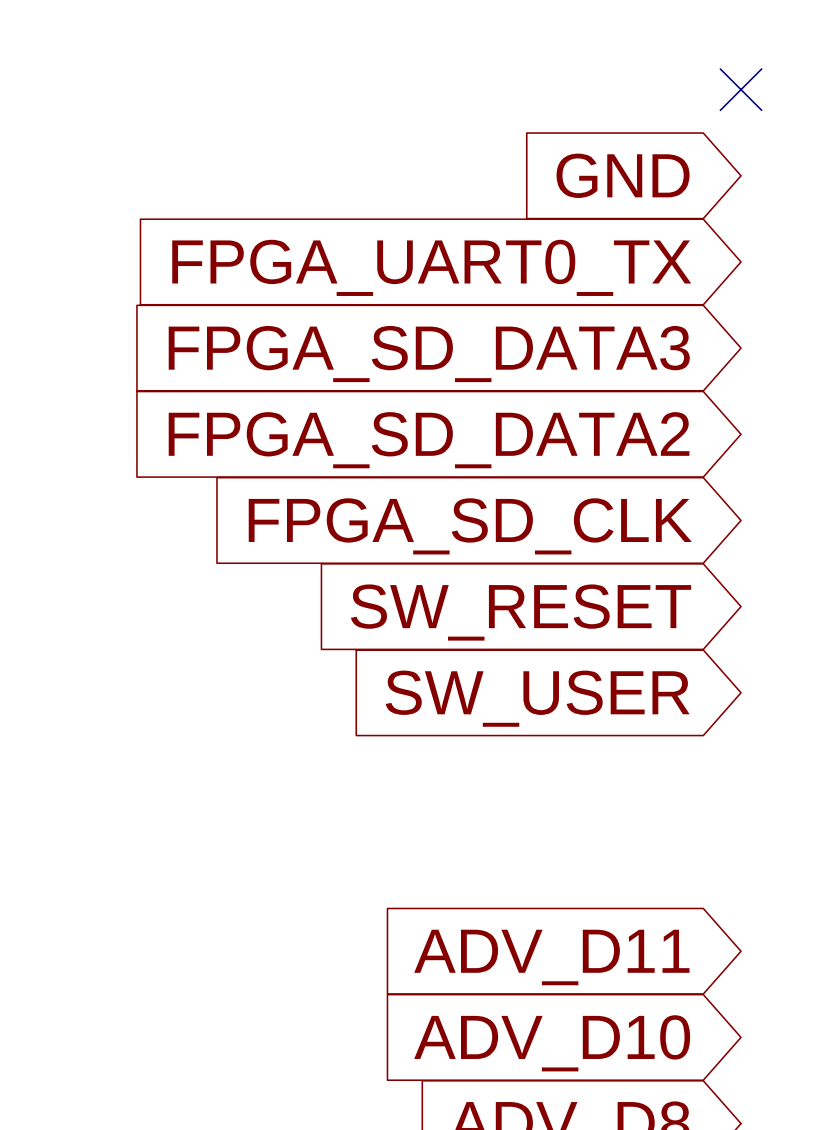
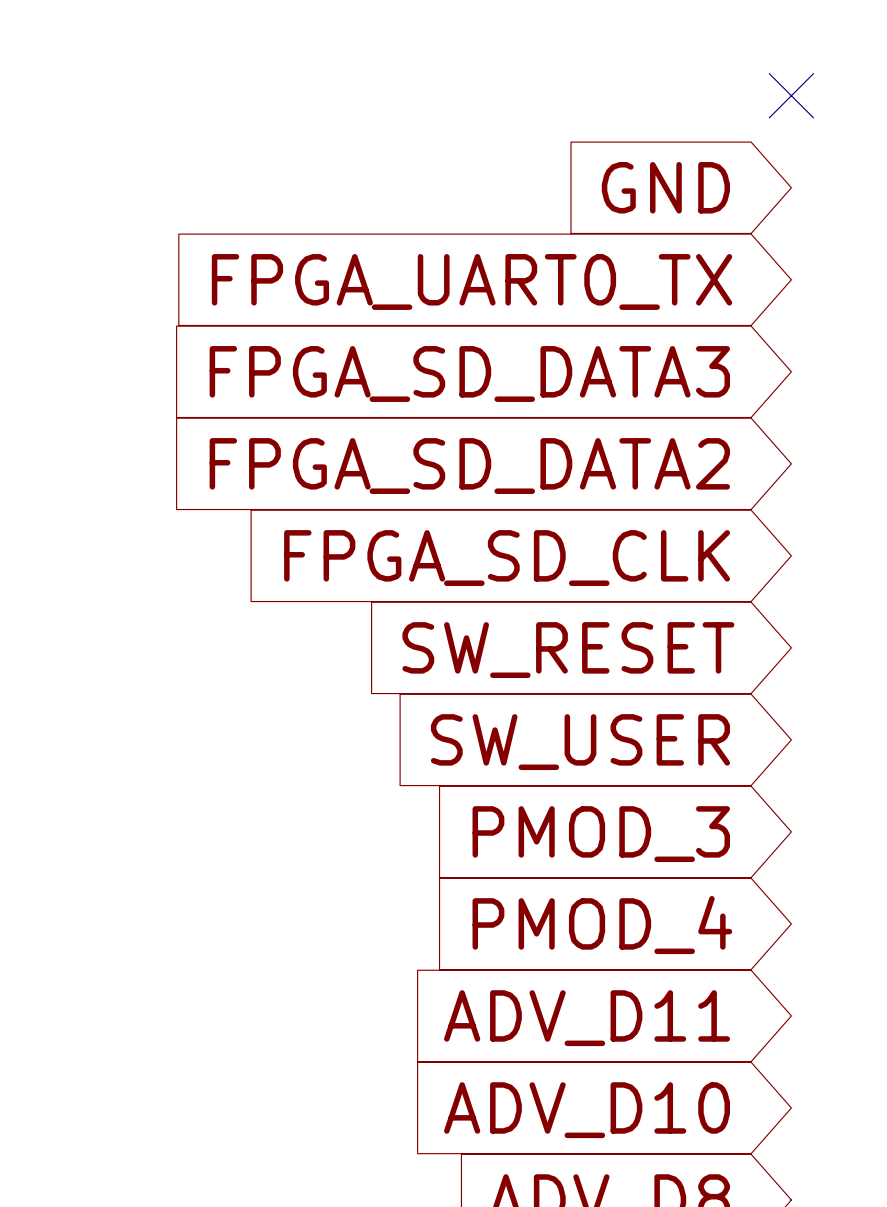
global label: none -> PMOD_3 (601, 834)
global label: none -> PMOD_4 (602, 925)

